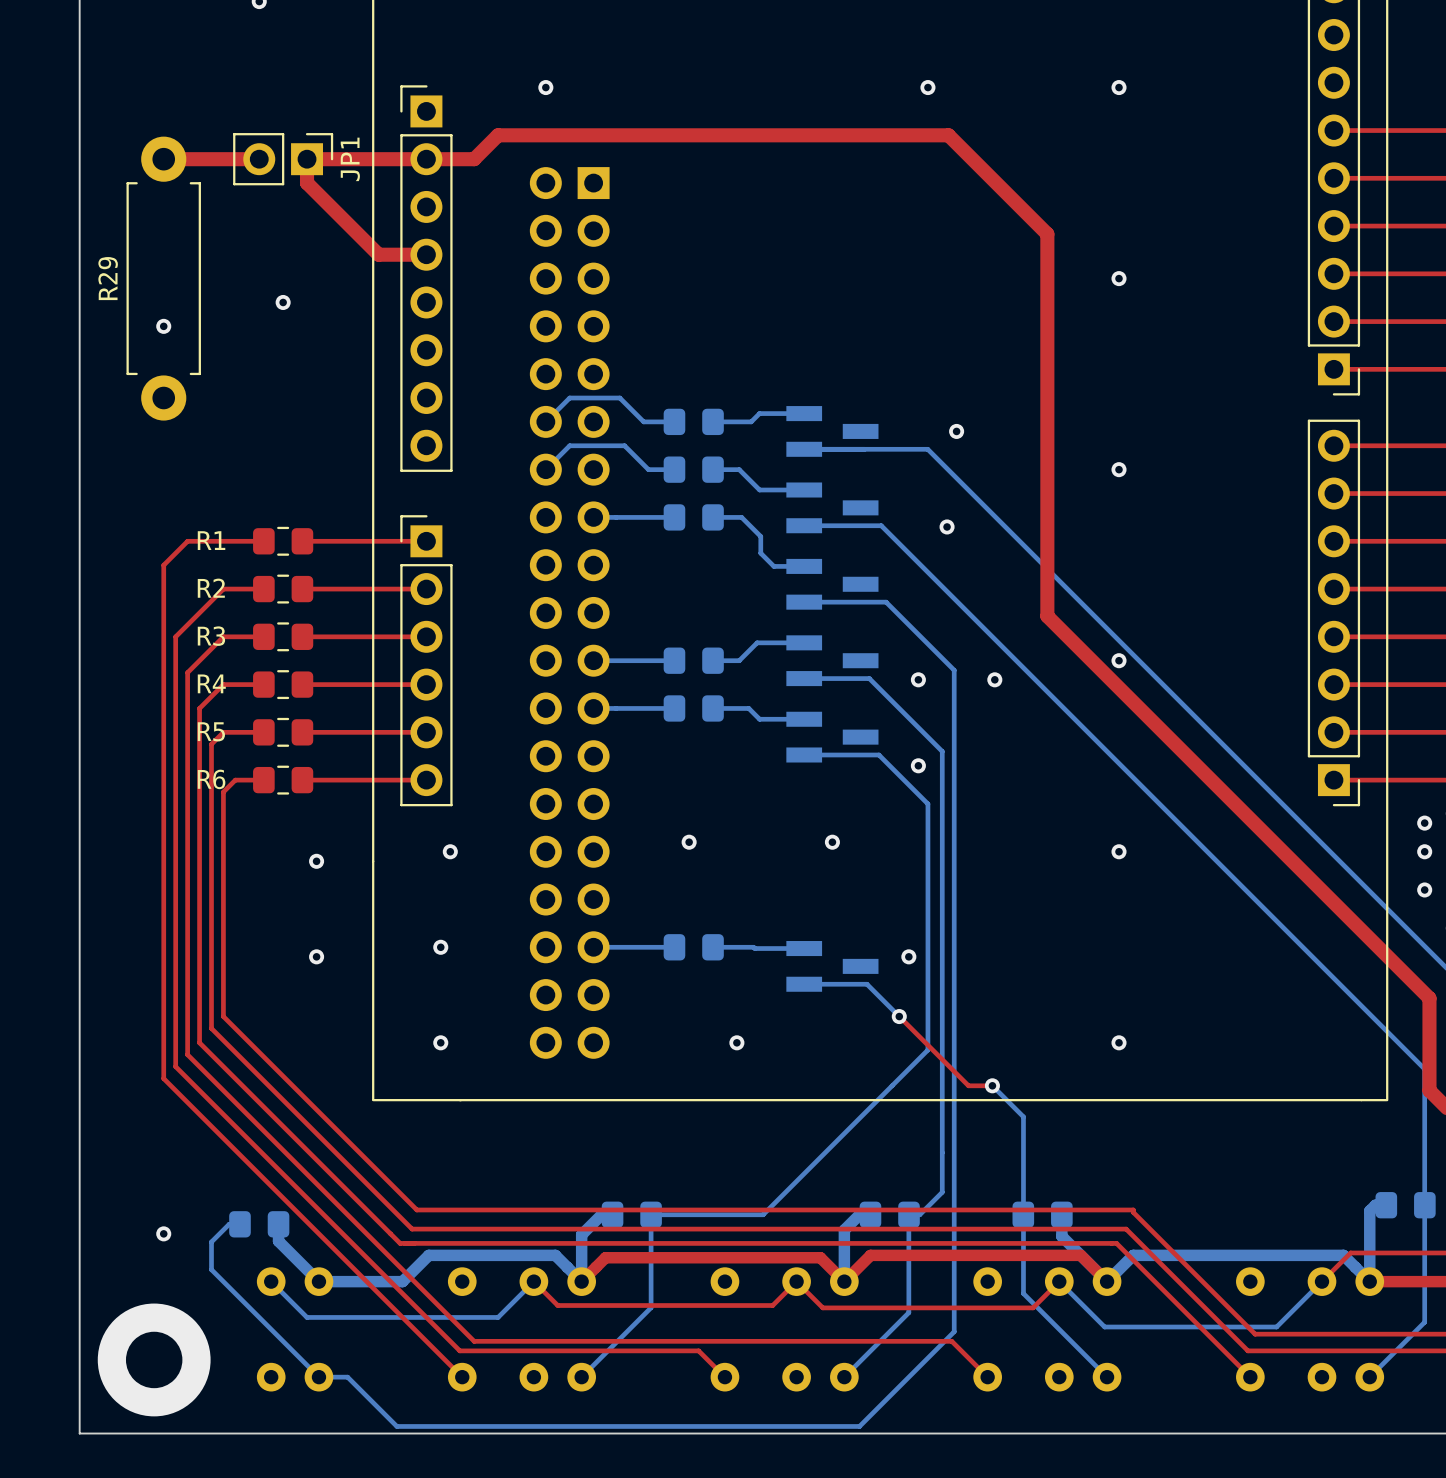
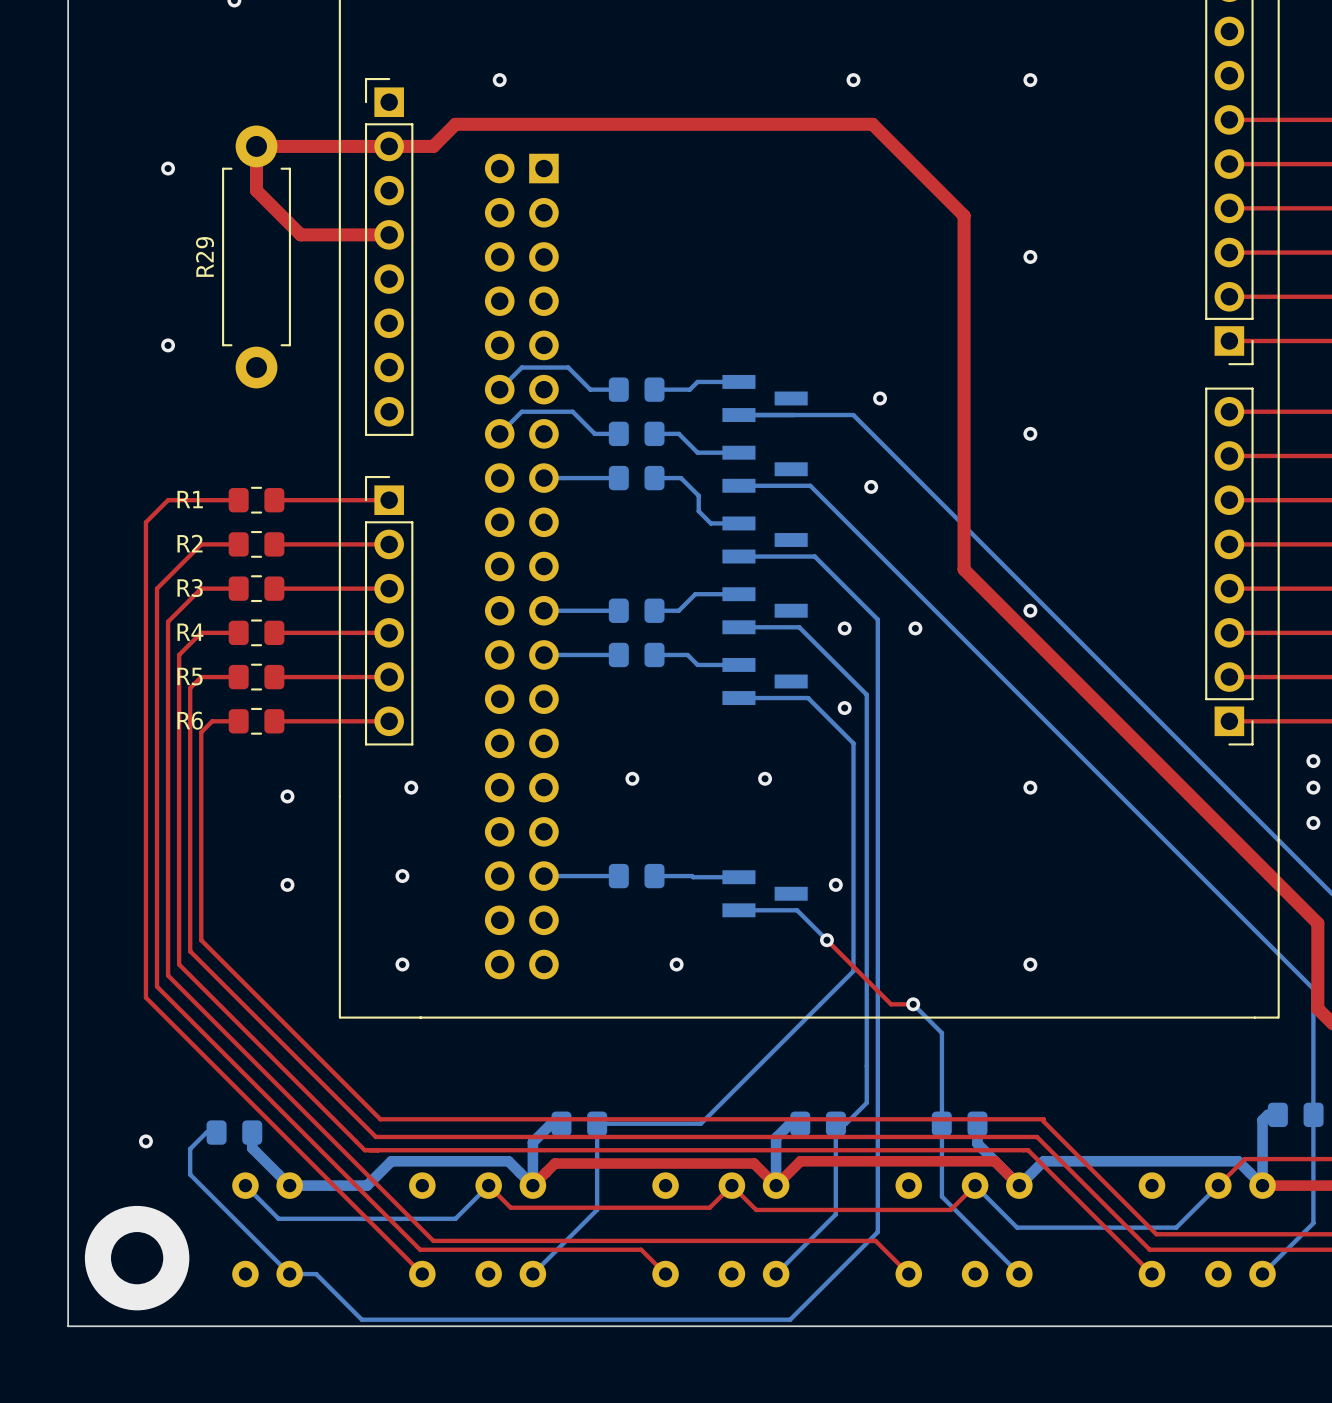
top track: (163, 159) (259, 159) -> none
JP1: (283, 159) -> none
top track: (307, 159) (307, 183) (378, 254) -> (278, 146) (256, 146) (256, 190) (300, 234) (344, 234)
via: none -> (168, 168)
R29 position: (163, 278) -> (256, 256)
via: (283, 302) -> none
via position: (163, 326) -> (168, 345)

